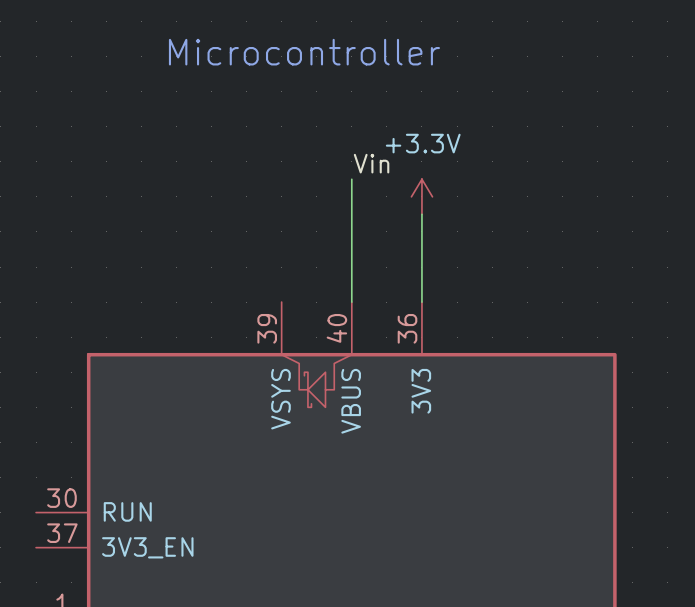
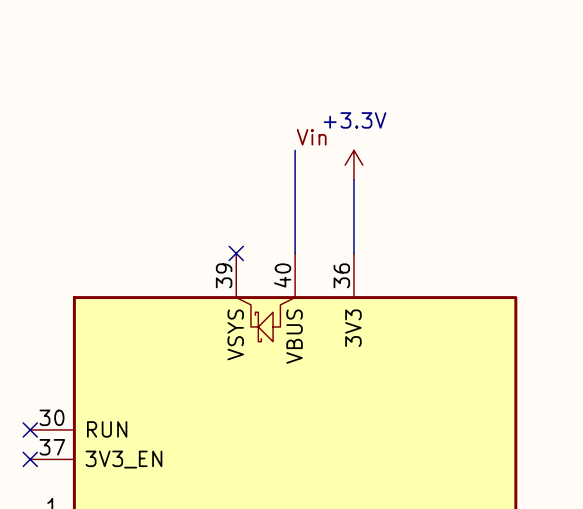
text: Microcontroller (304, 52) -> none
no-connect mark: none -> (236, 253)
no-connect mark: none -> (30, 429)
no-connect mark: none -> (30, 459)

